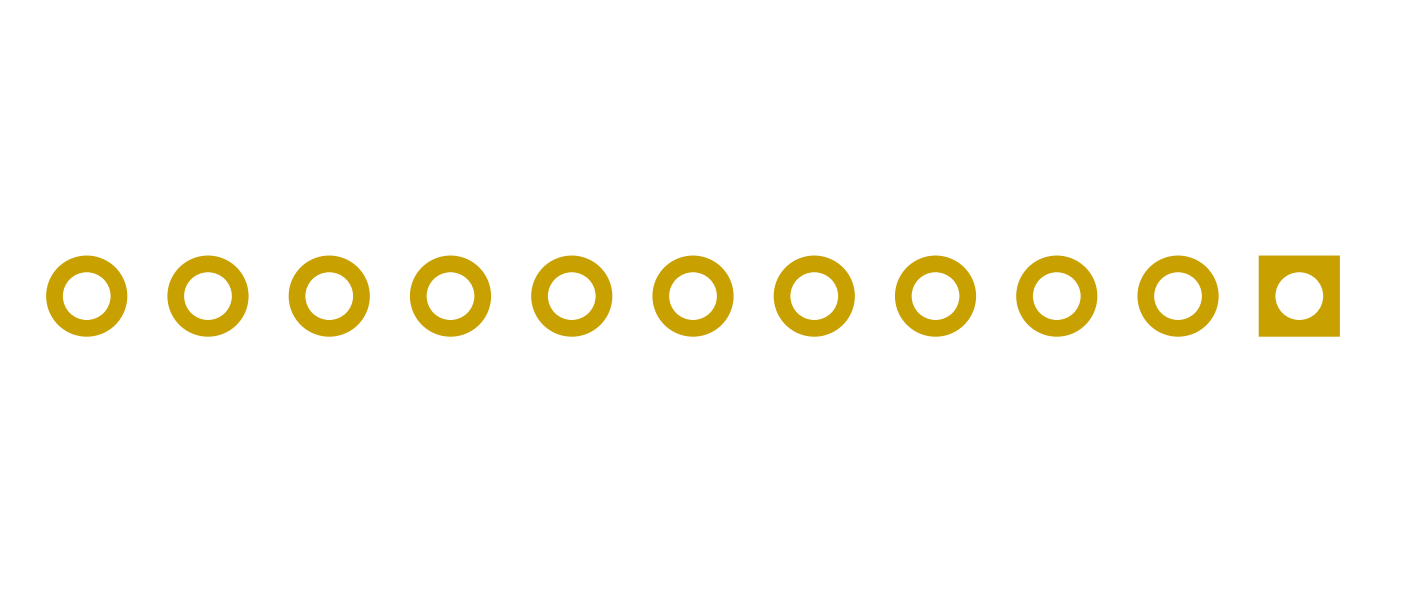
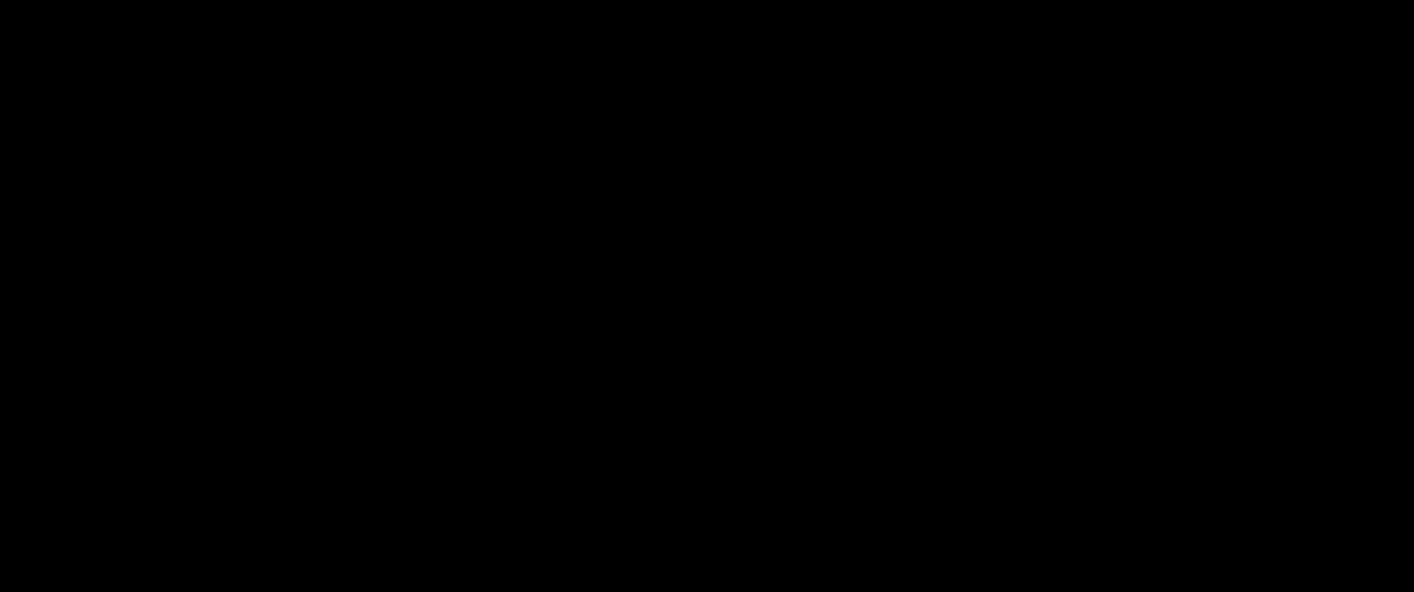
part: (693, 296) -> none

